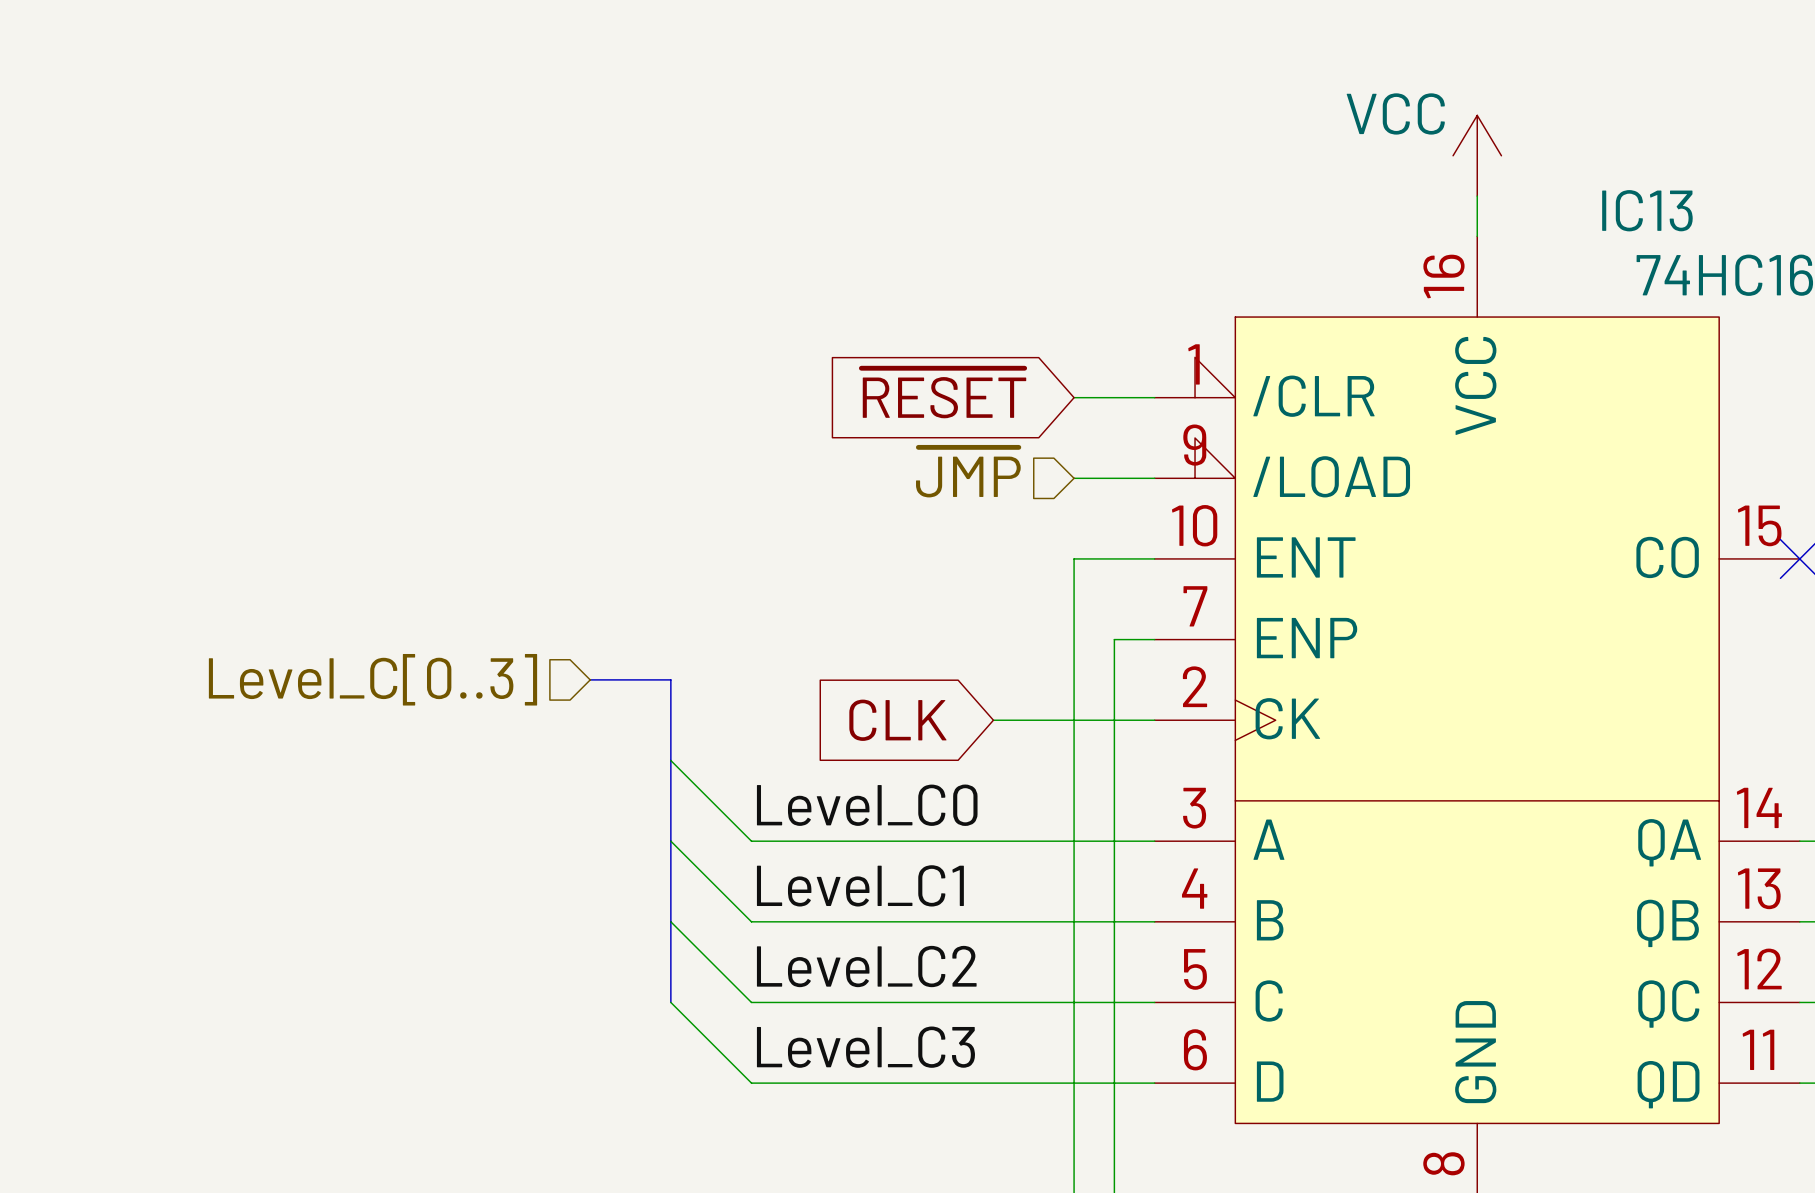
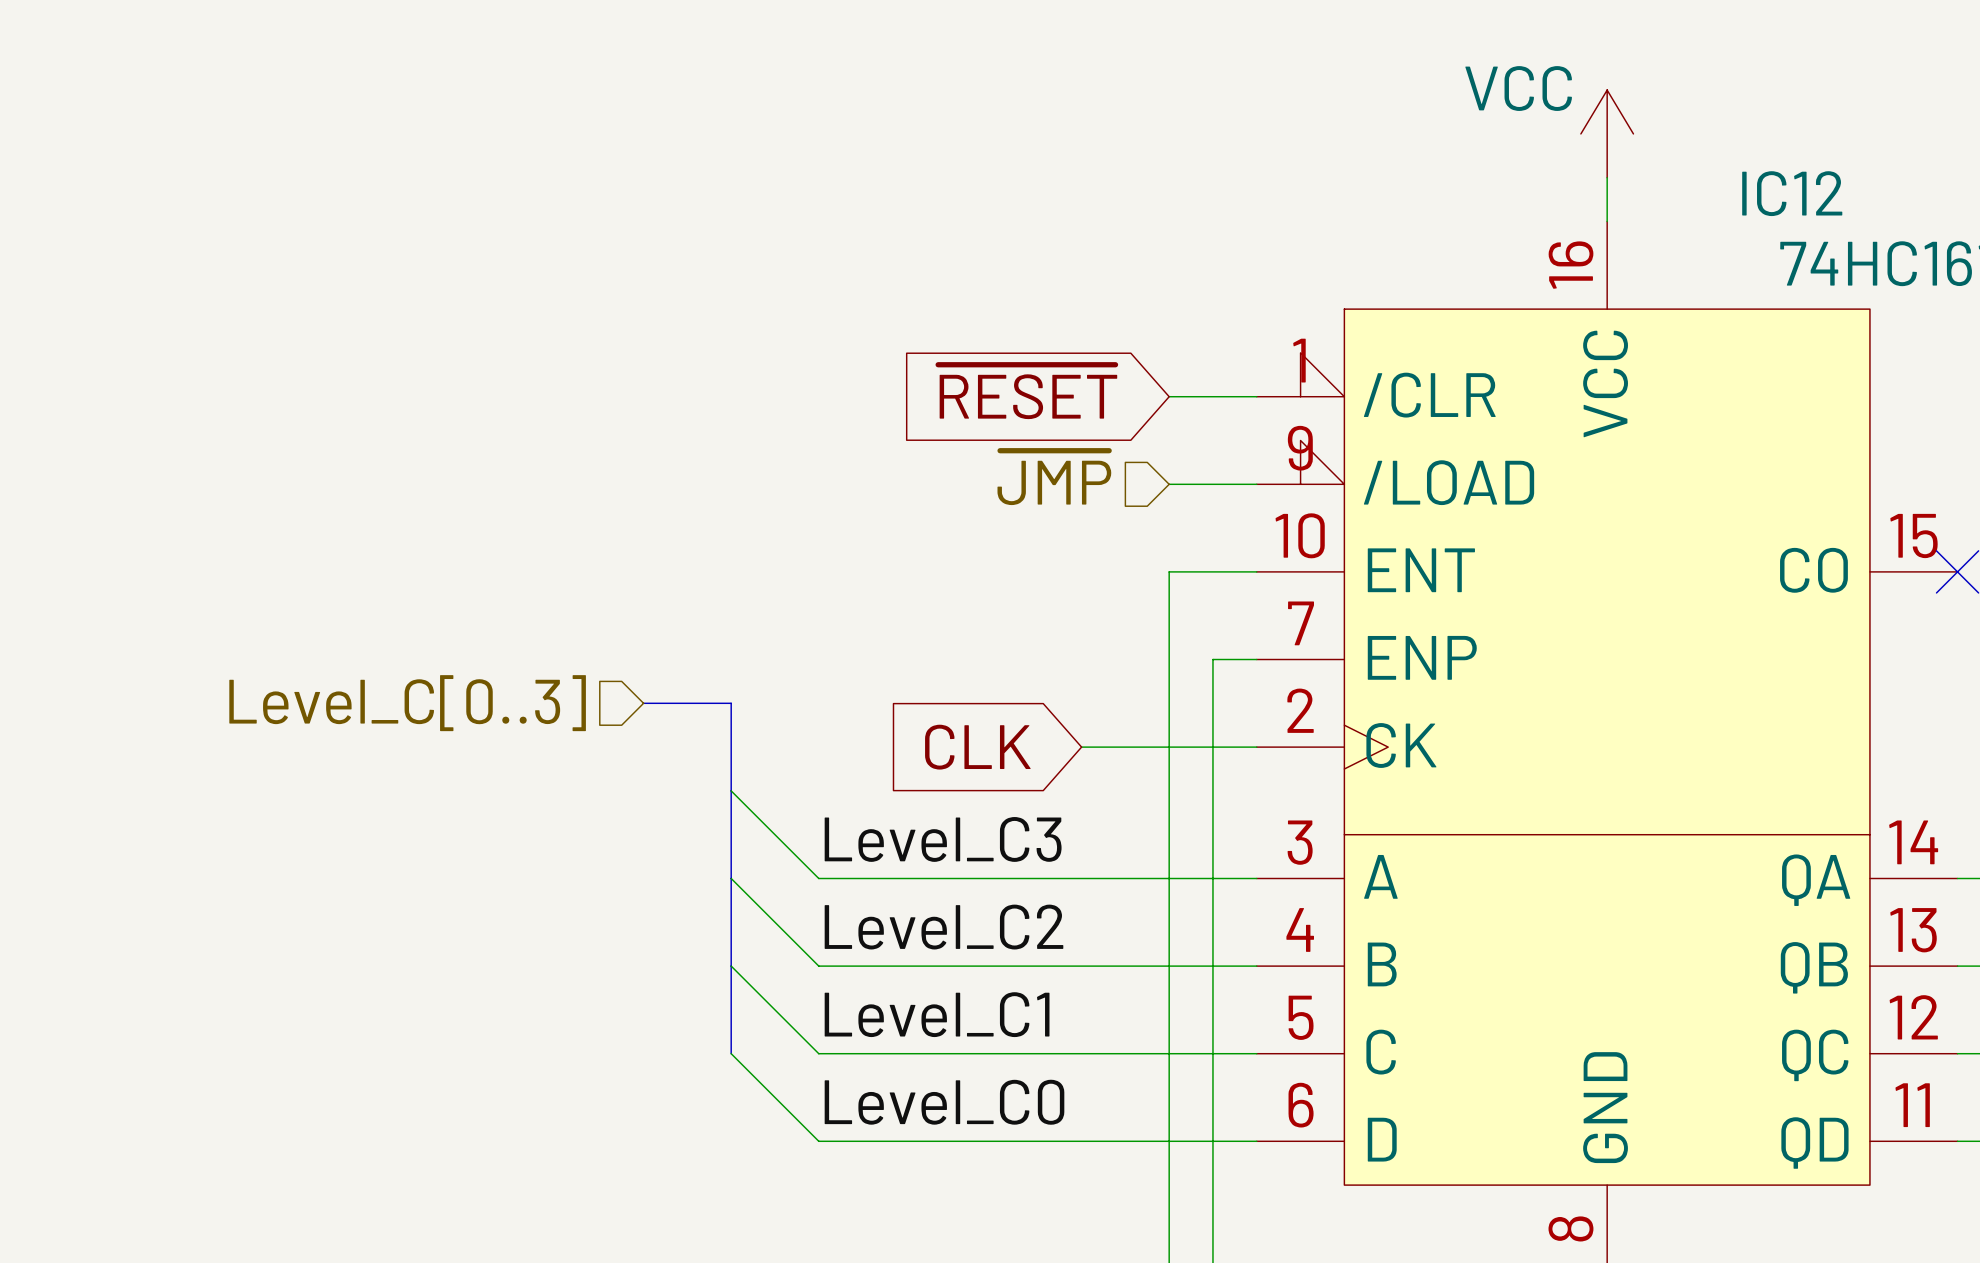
IC13 name: IC13 (1647, 210) -> IC12 (1792, 193)
label: Level_C0 (867, 805) -> Level_C3 (943, 839)
label: Level_C1 (860, 885) -> Level_C2 (943, 927)
label: Level_C2 (866, 966) -> Level_C1 (937, 1014)
label: Level_C3 (865, 1047) -> Level_C0 (944, 1102)

